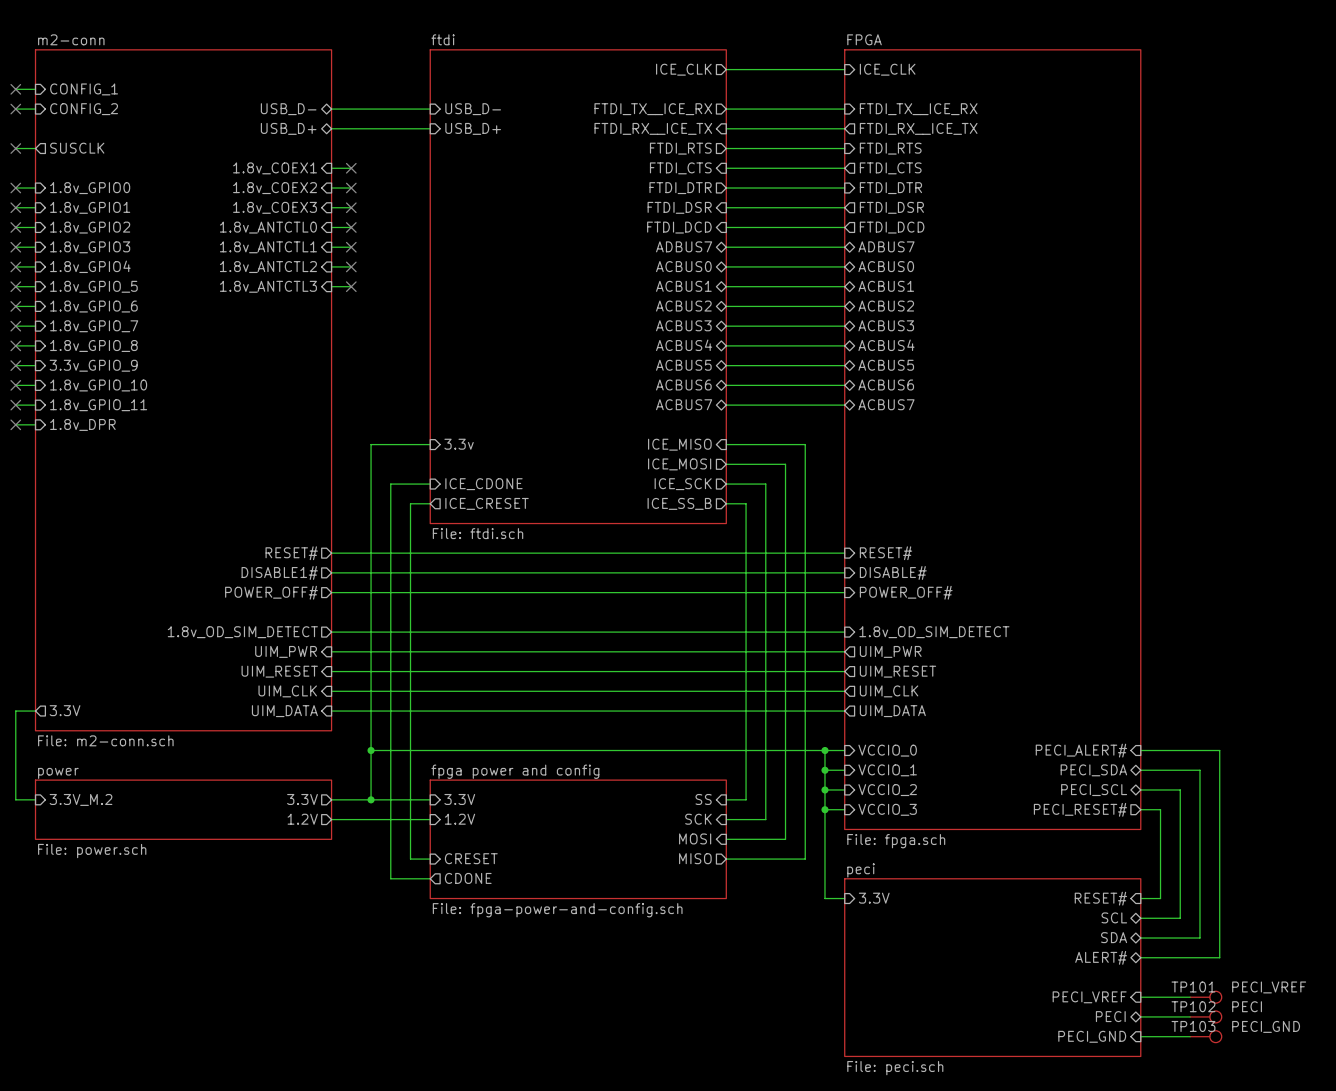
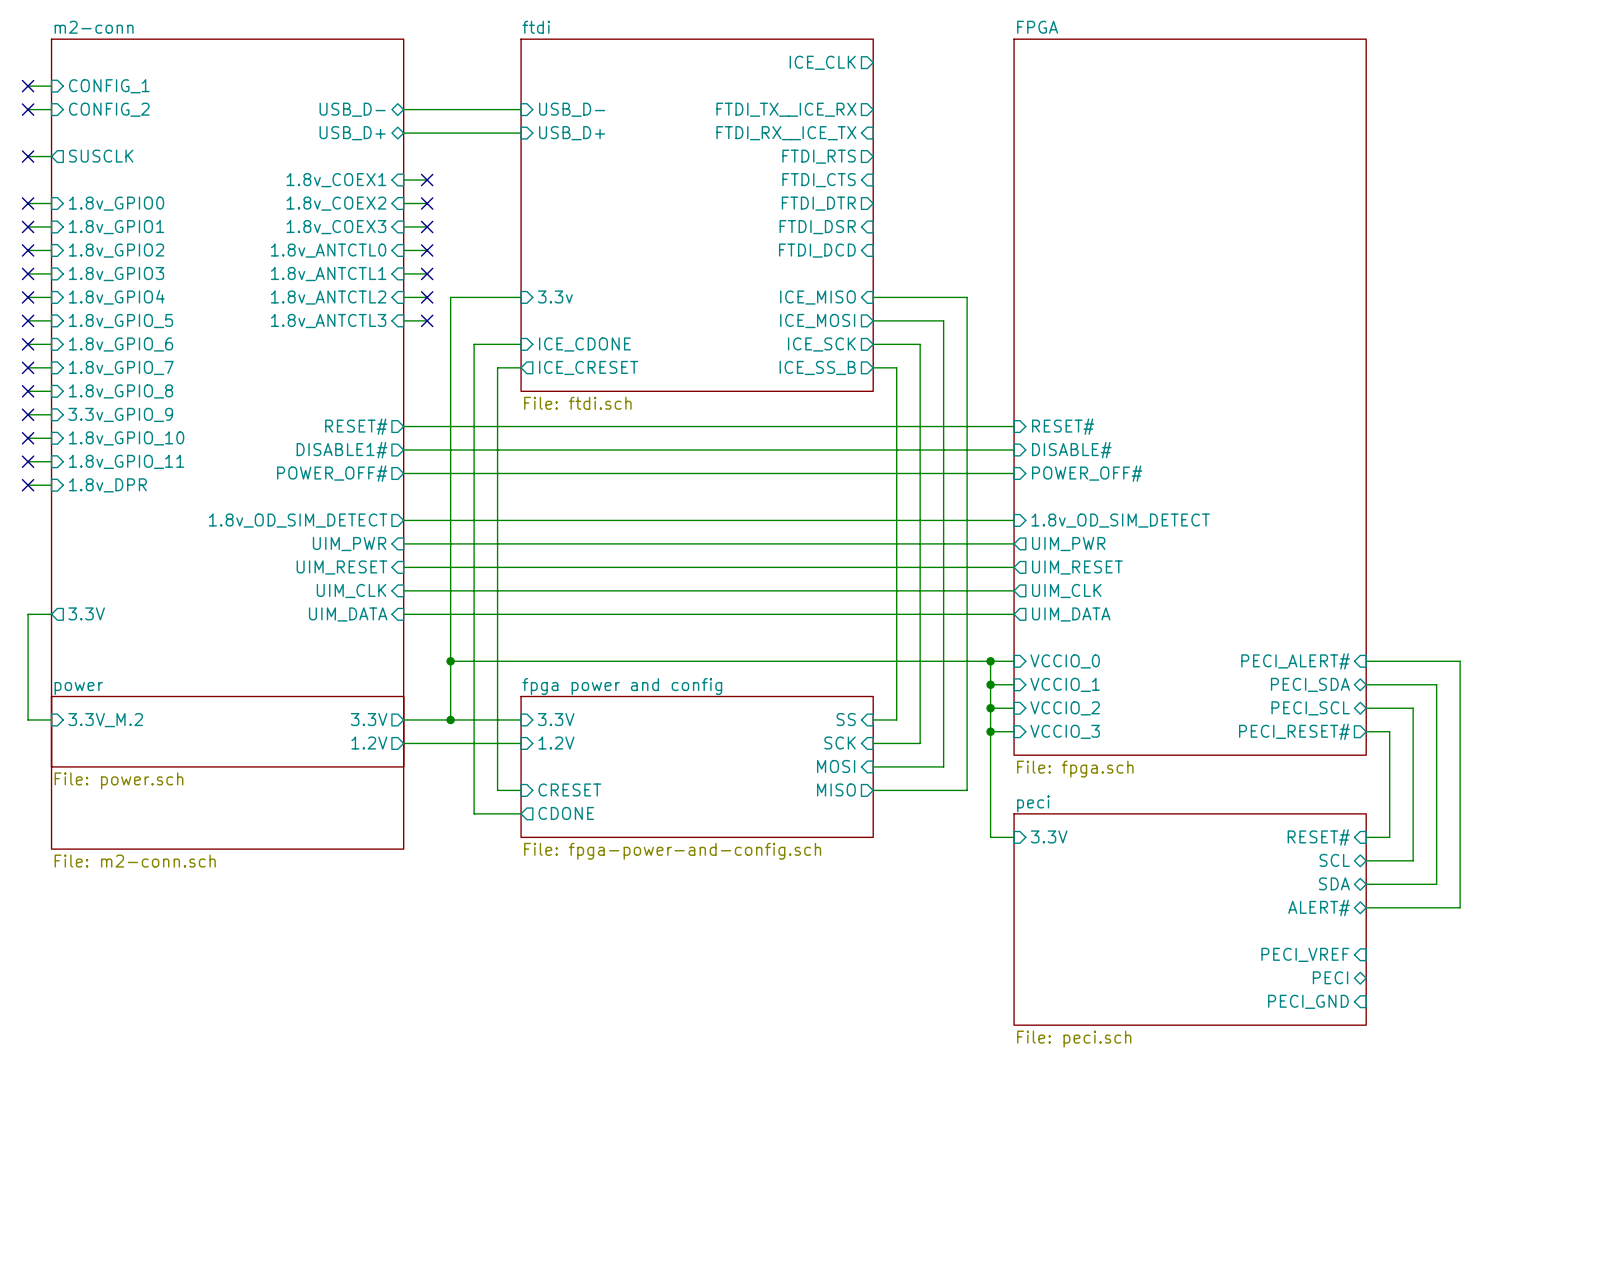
wire: (726, 69) (844, 69) -> none
sheet pin: ICE_CLK (887, 69) -> none
wire: (726, 109) (844, 109) -> none
sheet pin: FTDI_TX__ICE_RX (918, 109) -> none
wire: (726, 128) (844, 128) -> none
sheet pin: FTDI_RX__ICE_TX (918, 128) -> none
wire: (726, 148) (844, 148) -> none
sheet pin: FTDI_RTS (890, 148) -> none
wire: (726, 168) (844, 168) -> none
sheet pin: FTDI_CTS (890, 168) -> none
wire: (726, 188) (844, 188) -> none
sheet pin: FTDI_DTR (890, 188) -> none
sheet ftdi: none -> File: ftdi.sch (697, 215)
wire: (726, 207) (844, 207) -> none
sheet pin: FTDI_DSR (891, 207) -> none
wire: (726, 227) (844, 227) -> none
sheet pin: FTDI_DCD (892, 227) -> none
sheet pin: ADBUS7 (684, 246) -> none
sheet pin: ADBUS7 (886, 246) -> none
wire: (726, 247) (844, 247) -> none
sheet pin shape: bidirectional (683, 266) -> input (817, 297)
sheet pin: ACBUS0 (683, 266) -> ICE_MISO (817, 297)
wire: (805, 266) (844, 266) -> (967, 297) (967, 508)
sheet pin: ACBUS0 (886, 266) -> none
sheet ftdi: File: ftdi.sch (578, 286) -> none
sheet pin shape: bidirectional (683, 286) -> output (817, 321)
sheet pin: ACBUS1 (683, 286) -> ICE_MOSI (817, 321)
wire: (785, 286) (844, 286) -> (943, 320) (943, 532)
sheet pin: ACBUS1 (886, 286) -> none
sheet pin shape: bidirectional (683, 306) -> output (821, 344)
sheet pin: ACBUS2 (683, 306) -> ICE_SCK (821, 344)
wire: (765, 306) (844, 306) -> none
sheet pin: ACBUS2 (886, 306) -> none
sheet pin shape: bidirectional (683, 325) -> output (817, 367)
sheet pin: ACBUS3 (683, 325) -> ICE_SS_B (817, 367)
sheet pin: ACBUS3 (886, 325) -> none
wire: (746, 326) (844, 326) -> none
sheet pin: ACBUS4 (684, 345) -> none
wire: (726, 345) (844, 345) -> none
sheet pin: ACBUS4 (886, 345) -> none
sheet FPGA: none -> File: fpga.sch (1190, 397)
sheet pin: ACBUS5 (683, 365) -> none
wire: (726, 365) (844, 365) -> none
sheet pin: ACBUS5 (886, 365) -> none
sheet pin: none -> RESET# (1063, 426)
sheet pin: ACBUS6 (683, 385) -> none
wire: (726, 385) (844, 385) -> none
sheet pin: ACBUS6 (886, 385) -> none
wire: none -> (403, 450) (1014, 450)
sheet pin: none -> DISABLE# (1071, 450)
sheet pin: ACBUS7 (684, 404) -> none
sheet pin: ACBUS7 (886, 404) -> none
wire: (726, 405) (844, 405) -> none
wire: none -> (403, 473) (1014, 473)
sheet pin: none -> POWER_OFF# (1087, 473)
sheet FPGA: File: fpga.sch (992, 439) -> none
wire: (371, 444) (430, 444) -> (450, 508) (450, 297) (521, 297)
sheet pin position: 3.3v (459, 444) -> 3.3v (555, 296)
sheet pin: ICE_MISO (679, 444) -> none
wire: (726, 444) (805, 444) -> none
wire: none -> (403, 520) (1014, 520)
sheet pin: none -> 1.8v_OD_SIM_DETECT (1120, 520)
sheet pin: ICE_MOSI (679, 464) -> none
wire: (726, 464) (785, 464) -> none
wire: (390, 484) (430, 484) -> (474, 555) (474, 344) (521, 344)
sheet pin position: ICE_CDONE (483, 484) -> ICE_CDONE (584, 344)
sheet pin: ICE_SCK (683, 484) -> none
wire: (726, 484) (765, 484) -> (920, 344) (920, 555)
wire: (410, 503) (430, 503) -> (497, 579) (497, 367) (521, 367)
sheet pin position: ICE_CRESET (487, 503) -> ICE_CRESET (588, 367)
sheet pin: ICE_SS_B (679, 503) -> none
wire: (726, 503) (746, 503) -> (896, 367) (896, 579)
sheet pin: none -> 3.3V (86, 613)
sheet pin position: RESET# (291, 553) -> RESET# (356, 426)
wire: (331, 553) (844, 553) -> (403, 426) (1014, 426)
sheet pin: RESET# (885, 553) -> none
sheet pin position: DISABLE1# (279, 572) -> DISABLE1# (342, 450)
wire: (331, 572) (371, 572) -> none
junction: none -> (450, 661)
junction: none -> (990, 661)
sheet pin: DISABLE# (893, 572) -> VCCIO_0 (1065, 661)
sheet pin position: POWER_OFF# (271, 592) -> POWER_OFF# (332, 473)
wire: (331, 592) (824, 592) -> none
junction: none -> (990, 684)
sheet pin: POWER_OFF# (906, 592) -> VCCIO_1 (1065, 684)
junction: none -> (990, 708)
sheet pin: none -> 3.3V (369, 719)
sheet pin: none -> 3.3V (556, 719)
wire: (371, 622) (371, 799) -> none
junction: none -> (450, 719)
wire: (746, 622) (746, 799) (726, 799) -> (896, 719) (873, 719)
sheet pin position: 1.8v_OD_SIM_DETECT (242, 632) -> 1.8v_OD_SIM_DETECT (298, 520)
wire: (331, 632) (824, 632) -> none
junction: none -> (990, 731)
sheet pin: 1.8v_OD_SIM_DETECT (934, 632) -> VCCIO_3 (1065, 731)
sheet pin: none -> 1.2V (369, 743)
sheet pin: none -> 1.2V (556, 743)
wire: (765, 641) (765, 819) (726, 819) -> (920, 743) (873, 743)
sheet pin position: UIM_PWR (286, 651) -> UIM_PWR (349, 544)
wire: (331, 651) (844, 651) -> (403, 543) (1014, 543)
sheet pin position: UIM_PWR (890, 651) -> UIM_PWR (1068, 544)
wire: (785, 661) (785, 839) (726, 839) -> (943, 766) (873, 766)
sheet pin position: UIM_RESET (279, 671) -> UIM_RESET (342, 567)
wire: (331, 671) (844, 671) -> (403, 567) (1014, 567)
sheet pin position: UIM_RESET (897, 671) -> UIM_RESET (1077, 567)
wire: (410, 681) (410, 859) (430, 859) -> (497, 790) (521, 790)
wire: (805, 681) (805, 859) (726, 859) -> (967, 790) (873, 790)
sheet pin position: UIM_CLK (287, 691) -> UIM_CLK (351, 590)
wire: (331, 691) (844, 691) -> (403, 590) (1014, 590)
sheet pin position: UIM_CLK (889, 691) -> UIM_CLK (1066, 590)
wire: (390, 701) (390, 878) (430, 878) -> (474, 813) (521, 813)
sheet pin: 3.3V (65, 710) -> none
wire: (35, 711) (15, 711) (15, 799) (35, 799) -> (51, 614) (28, 614) (28, 719) (51, 719)
sheet pin position: UIM_DATA (284, 711) -> UIM_DATA (348, 614)
wire: (331, 711) (844, 711) -> (403, 614) (1014, 614)
sheet pin position: UIM_DATA (892, 711) -> UIM_DATA (1071, 614)
sheet pin: none -> RESET# (1318, 837)
wire: (371, 750) (844, 750) -> none
junction: (371, 750) -> none
wire: (824, 750) (824, 898) (844, 898) -> (990, 661) (990, 837) (1014, 837)
junction: (824, 750) -> none
sheet pin: VCCIO_0 (887, 750) -> none
sheet pin position: PECI_ALERT# (1081, 750) -> PECI_ALERT# (1295, 661)
wire: (1140, 750) (1219, 750) -> (1366, 661) (1460, 661) (1460, 872)
wire: (824, 770) (844, 770) -> none
junction: (824, 770) -> none
sheet pin: VCCIO_1 (887, 770) -> none
sheet pin position: PECI_SDA (1093, 770) -> PECI_SDA (1310, 684)
wire: (1140, 770) (1199, 770) (1199, 938) (1140, 938) -> (1366, 684) (1436, 684) (1436, 884) (1366, 884)
wire: (1219, 780) (1219, 957) (1140, 957) -> (1460, 907) (1366, 907)
wire: (824, 789) (844, 789) -> (990, 708) (1014, 708)
junction: (824, 789) -> none
wire: (1140, 789) (1180, 789) (1180, 918) (1140, 918) -> (1366, 708) (1413, 708) (1413, 860) (1366, 860)
sheet pin position: VCCIO_2 (887, 790) -> VCCIO_2 (1065, 708)
sheet pin position: PECI_SCL (1094, 790) -> PECI_SCL (1310, 708)
sheet pin position: 3.3V_M.2 (81, 799) -> 3.3V_M.2 (105, 720)
sheet pin: 3.3V (302, 799) -> none
wire: (331, 799) (430, 799) -> (403, 719) (521, 719)
junction: (371, 799) -> none
sheet pin: 3.3V (459, 799) -> none
sheet pin position: SS (703, 799) -> SS (846, 719)
sheet power position: (183, 809) -> (227, 731)
wire: (824, 809) (844, 809) -> none
junction: (824, 809) -> none
sheet pin: VCCIO_3 (887, 809) -> none
sheet pin position: PECI_RESET# (1080, 809) -> PECI_RESET# (1294, 731)
wire: (1140, 809) (1160, 809) (1160, 898) (1140, 898) -> (1366, 731) (1389, 731) (1389, 837) (1366, 837)
sheet pin: 1.2V (302, 819) -> none
wire: (331, 819) (430, 819) -> (403, 743) (521, 743)
sheet pin: 1.2V (460, 819) -> none
sheet pin position: SCK (698, 819) -> SCK (840, 743)
sheet pin position: MOSI (695, 838) -> MOSI (836, 766)
sheet fpga power and config position: (578, 839) -> (697, 766)
sheet pin position: CRESET (471, 858) -> CRESET (569, 789)
sheet pin position: MISO (695, 858) -> MISO (836, 789)
sheet pin position: CDONE (468, 878) -> CDONE (566, 813)
sheet pin position: 3.3V (874, 898) -> 3.3V (1049, 836)
sheet pin: RESET# (1100, 898) -> none
sheet pin position: SCL (1114, 917) -> SCL (1334, 860)
sheet pin position: SDA (1114, 937) -> SDA (1334, 883)
sheet pin position: ALERT# (1101, 957) -> ALERT# (1319, 907)
sheet peci position: (992, 967) -> (1190, 919)
sheet pin position: PECI_VREF (1089, 997) -> PECI_VREF (1305, 954)
wire: (1140, 997) (1190, 997) -> none
TP101: PECI_VREF (1205, 997) -> none
sheet pin position: PECI (1110, 1016) -> PECI (1330, 977)
wire: (1140, 1016) (1190, 1016) -> none
TP102: PECI (1205, 1016) -> none
sheet pin position: PECI_GND (1092, 1036) -> PECI_GND (1308, 1001)
wire: (1140, 1036) (1190, 1036) -> none
TP103: PECI_GND (1205, 1036) -> none

